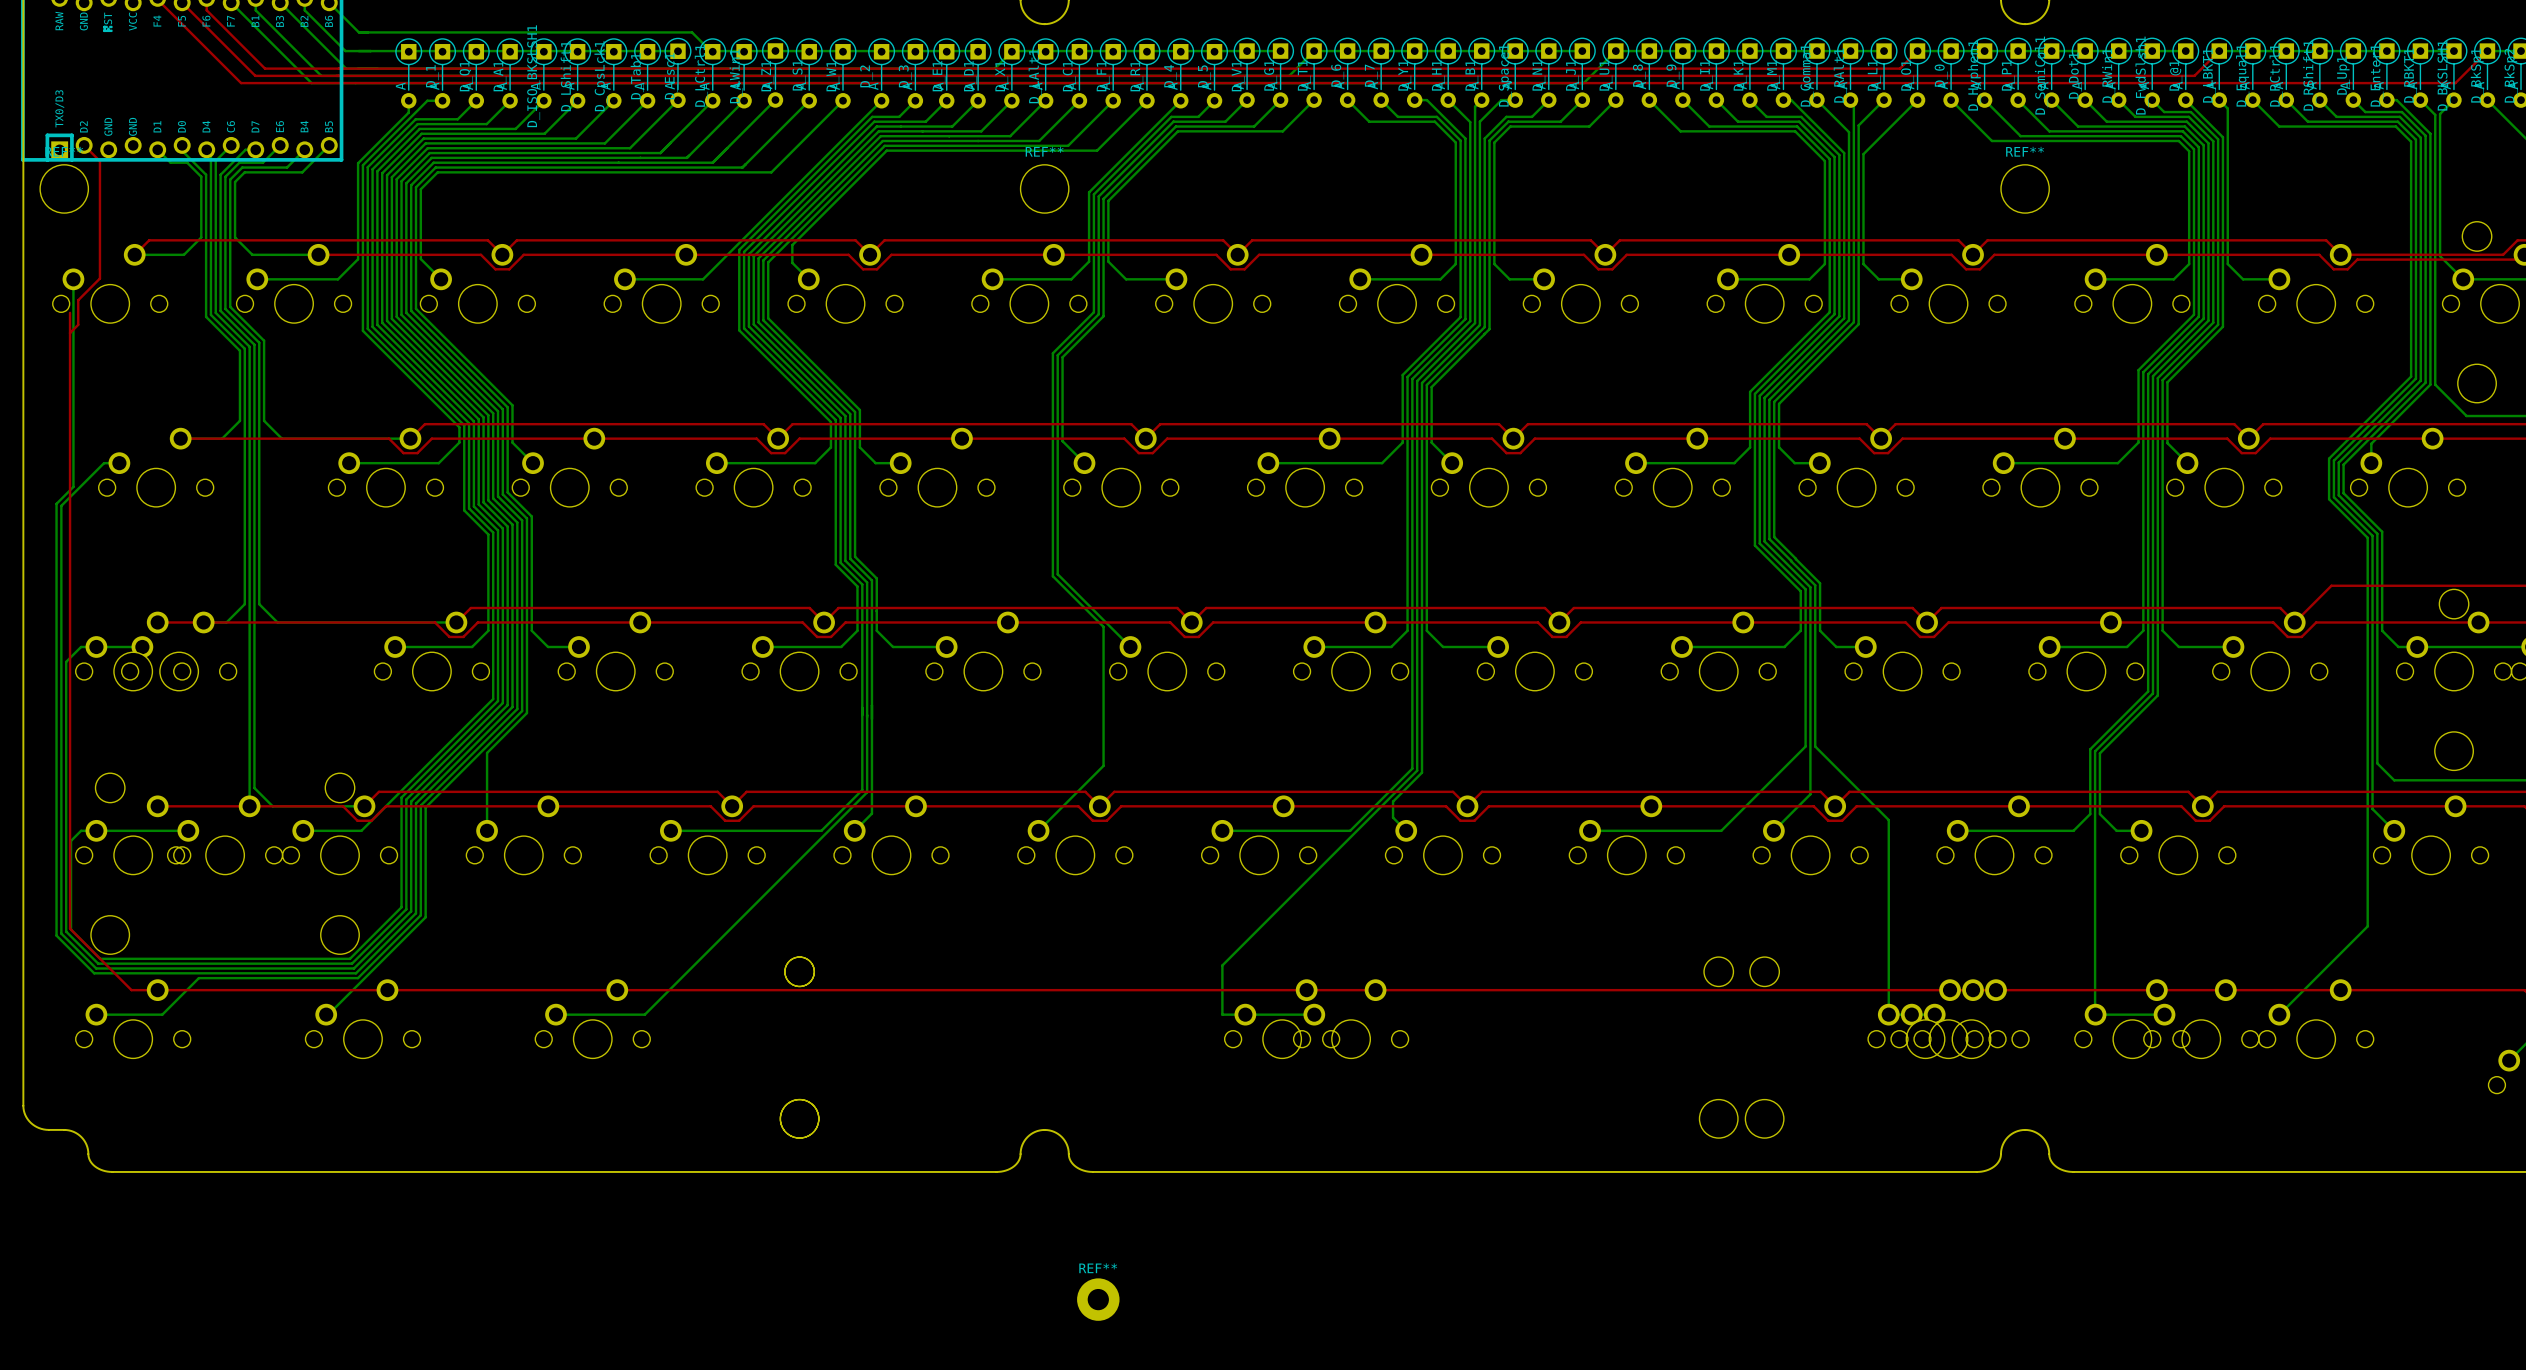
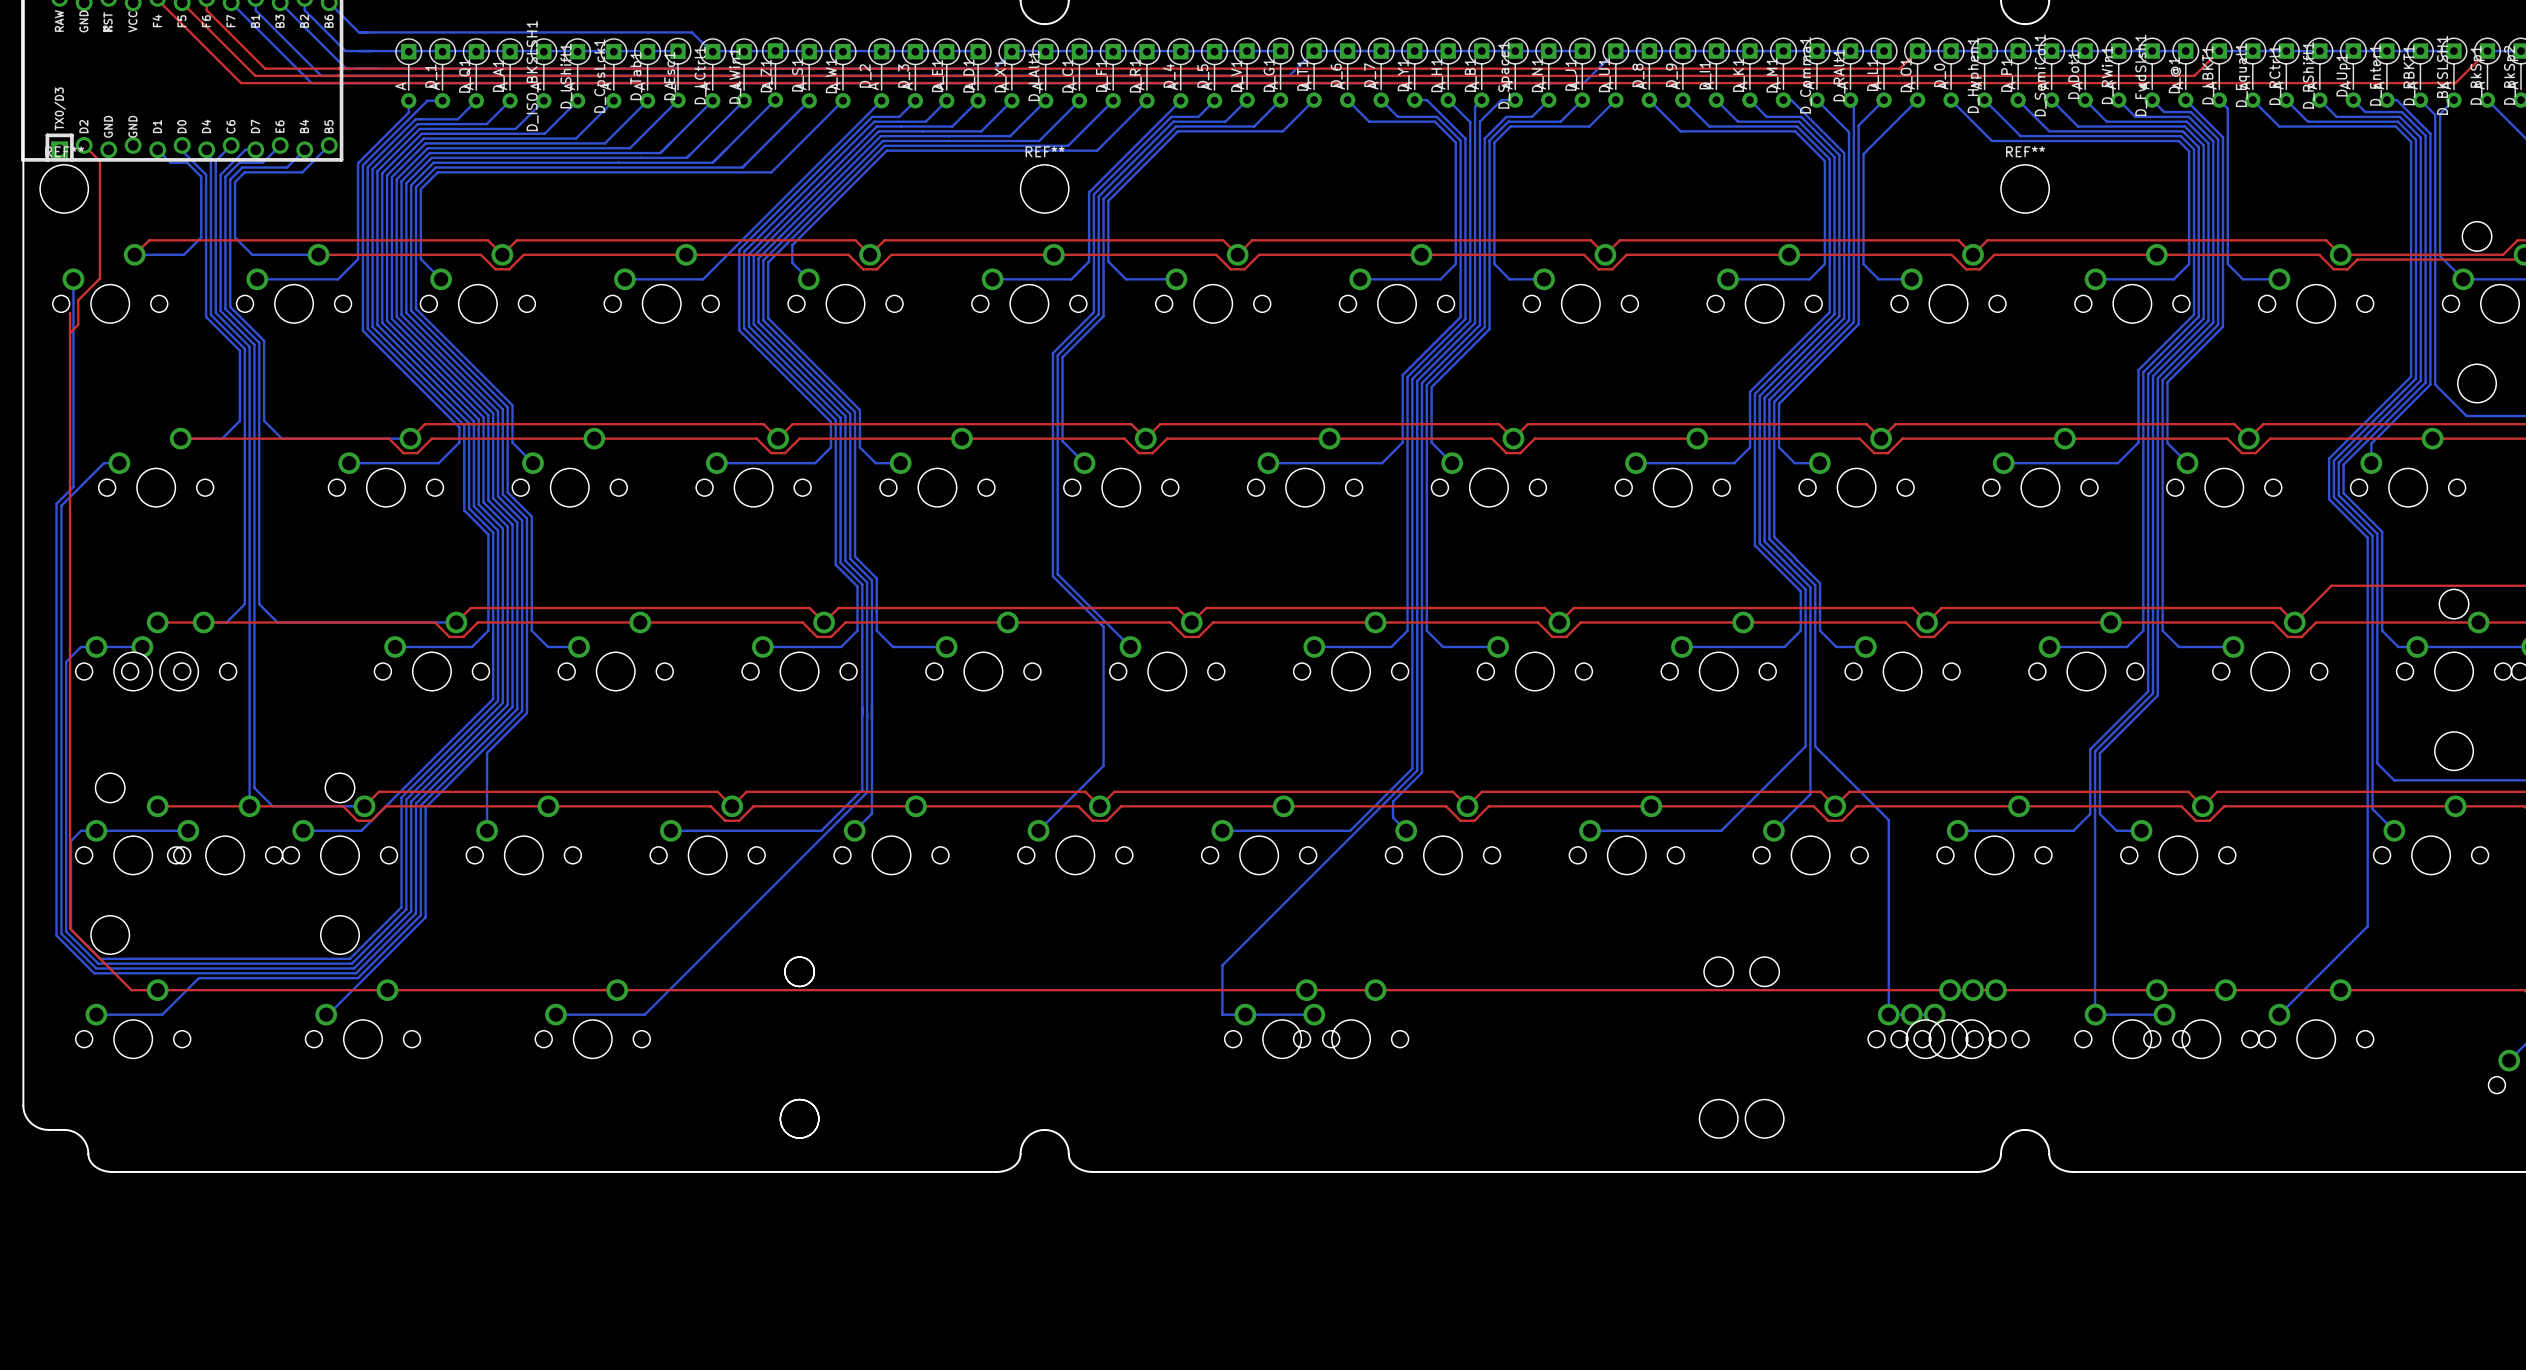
REF**: (1098, 1299) -> none

